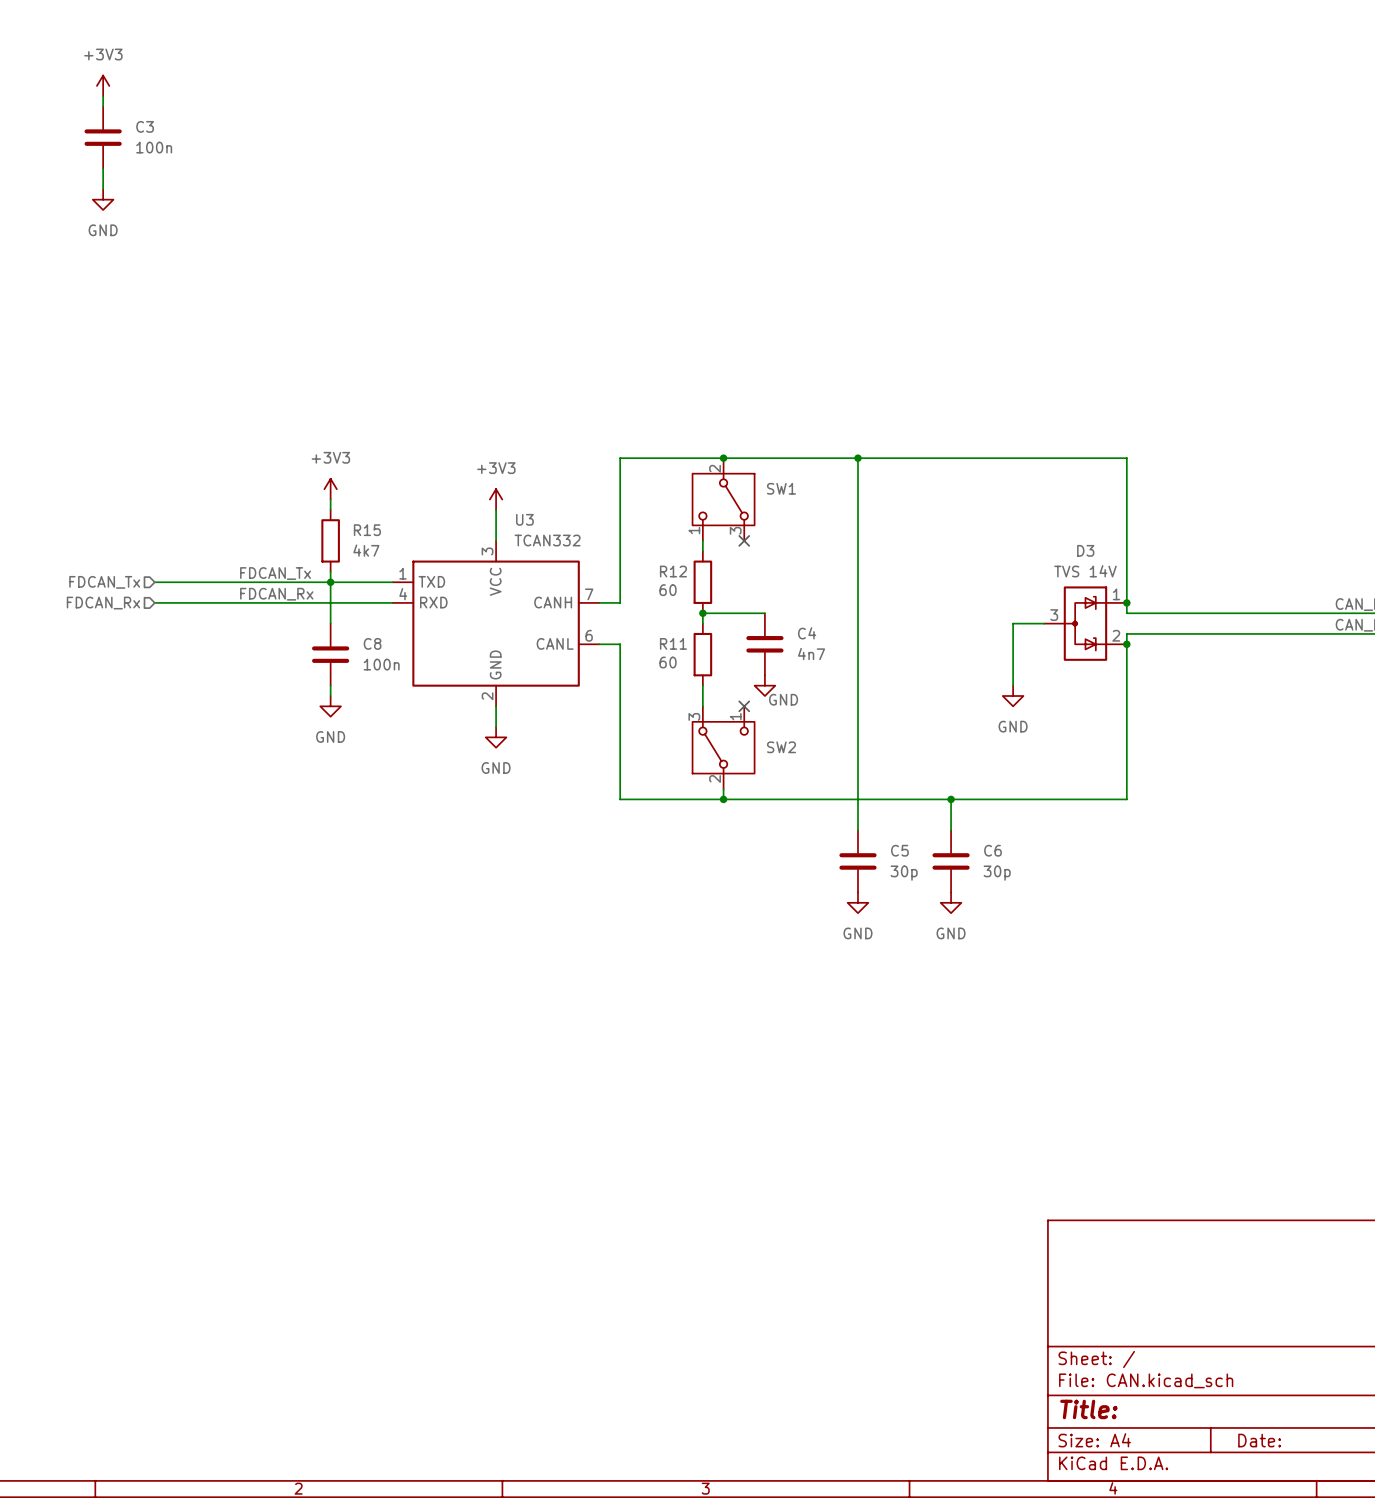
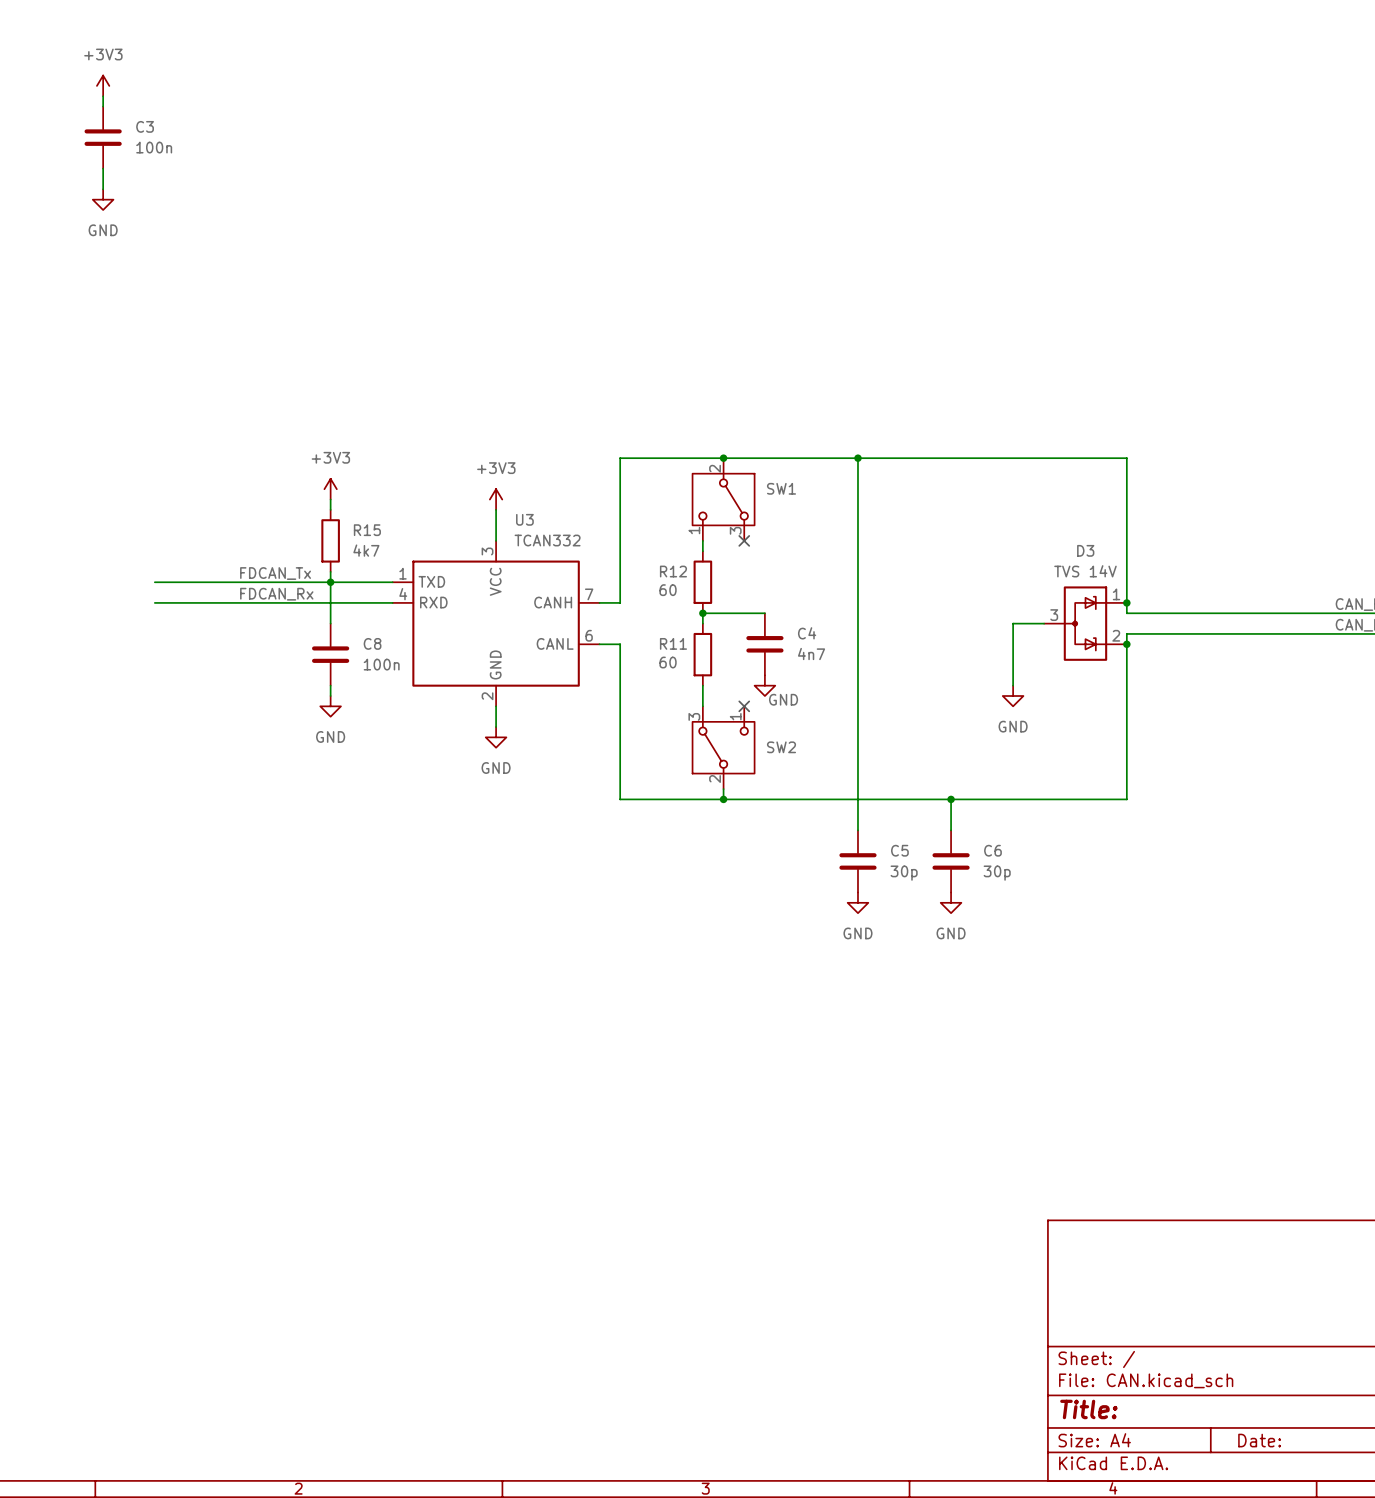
hierarchical label: FDCAN_Tx (104, 582) -> none
hierarchical label: FDCAN_Rx (103, 603) -> none

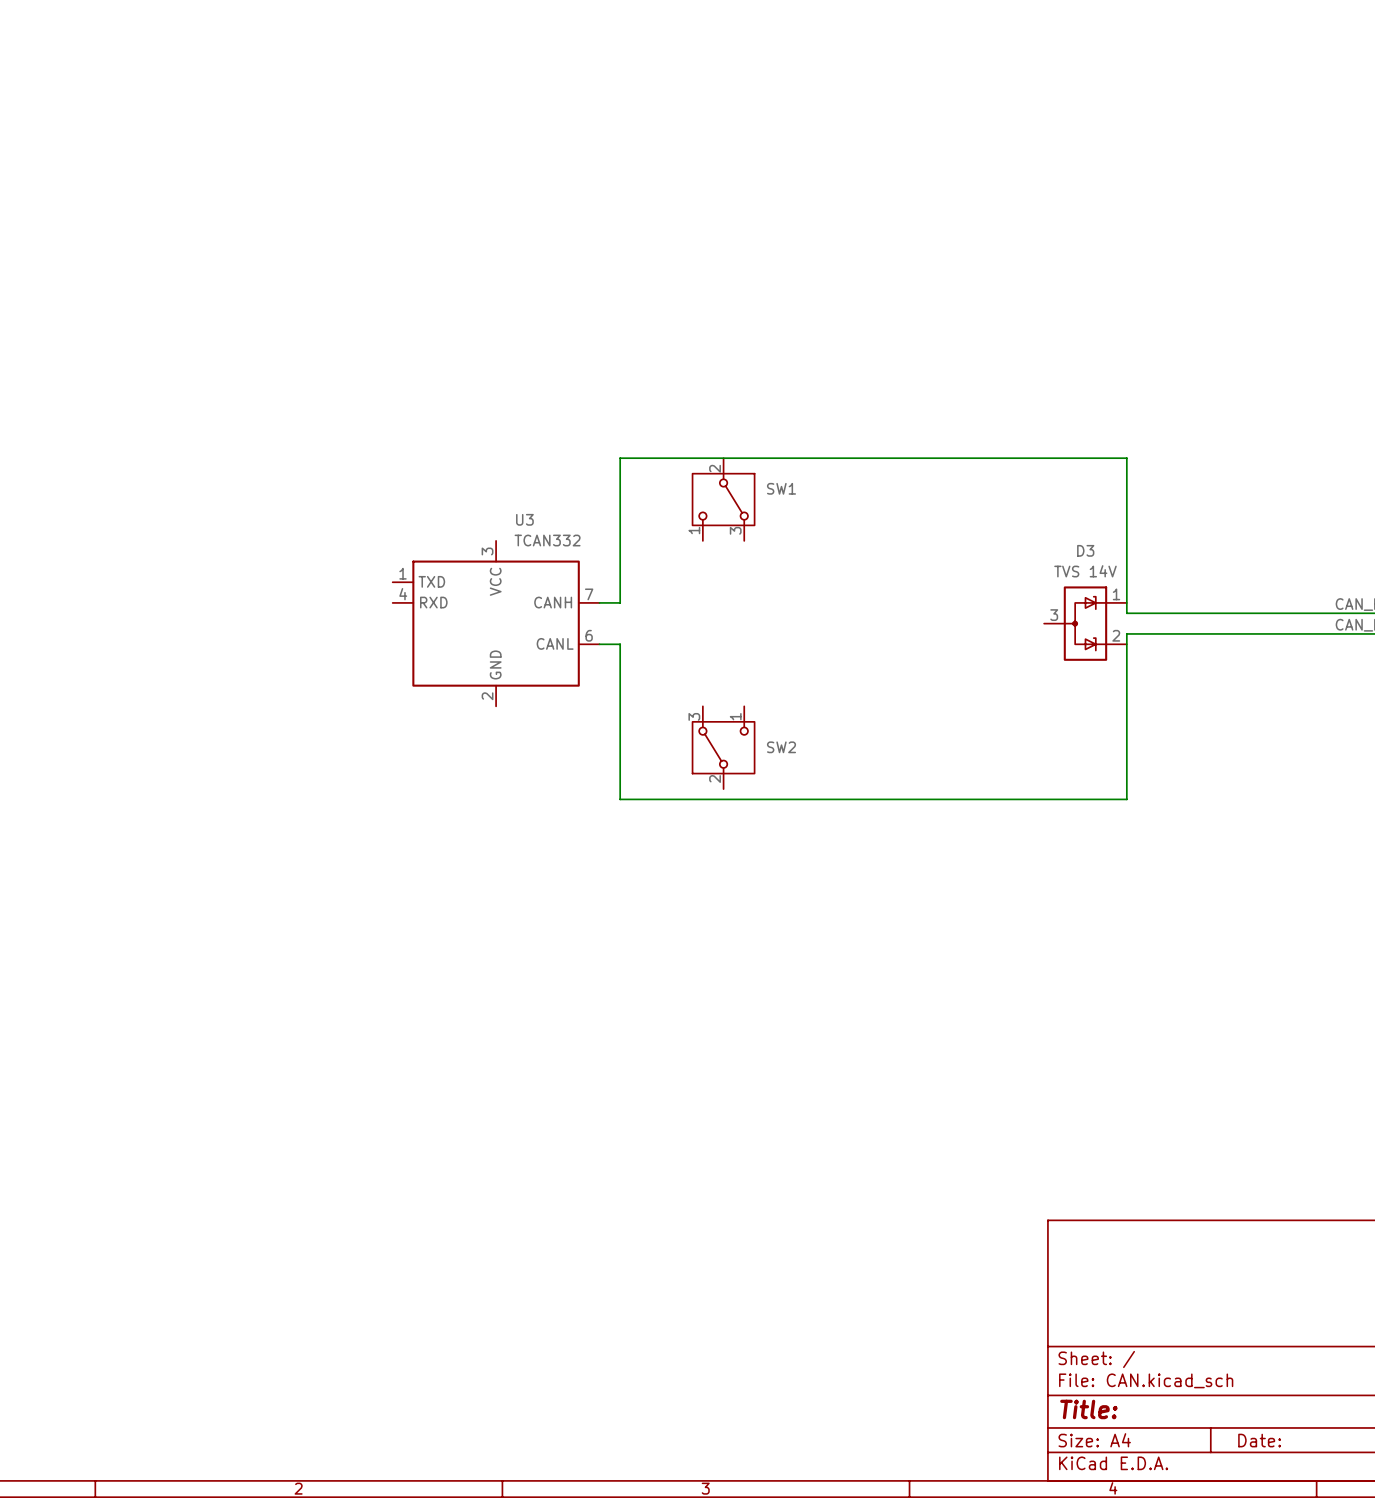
power symbol: +3V3 (103, 85) -> none
wire: (103, 96) (103, 106) -> none
C3: 100n (103, 137) -> none
wire: (103, 168) (103, 189) -> none
power symbol: GND (103, 199) -> none
junction: (723, 458) -> none
wire: (857, 458) (857, 830) -> none
junction: (857, 458) -> none
power symbol: +3V3 (330, 489) -> none
wire: (330, 499) (330, 509) -> none
power symbol: +3V3 (496, 499) -> none
wire: (496, 509) (496, 540) -> none
R15: 4k7 (330, 540) -> none
wire: (702, 540) (702, 551) -> none
no-connect mark: (744, 540) -> none
wire: (330, 571) (330, 623) -> none
label: FDCAN_Tx (275, 573) -> none
wire: (154, 582) (392, 582) -> none
junction: (330, 582) -> none
R12: 60 (702, 582) -> none
label: FDCAN_Rx (276, 594) -> none
wire: (154, 602) (392, 602) -> none
junction: (1126, 602) -> none
junction: (702, 613) -> none
wire: (764, 613) (702, 613) (702, 623) -> none
wire: (1044, 623) (1013, 623) (1013, 685) -> none
C4: 4n7 (764, 644) -> none
junction: (1126, 644) -> none
C8: 100n (330, 654) -> none
R11: 60 (702, 654) -> none
wire: (330, 685) (330, 696) -> none
wire: (702, 685) (702, 706) -> none
power symbol: GND (764, 685) -> none
power symbol: GND (1013, 696) -> none
power symbol: GND (330, 706) -> none
wire: (496, 706) (496, 727) -> none
no-connect mark: (744, 706) -> none
power symbol: GND (496, 737) -> none
wire: (723, 789) (723, 799) -> none
junction: (723, 799) -> none
wire: (951, 799) (951, 830) -> none
junction: (951, 799) -> none
C5: 30p (857, 861) -> none
C6: 30p (951, 861) -> none
power symbol: GND (857, 902) -> none
power symbol: GND (951, 902) -> none

